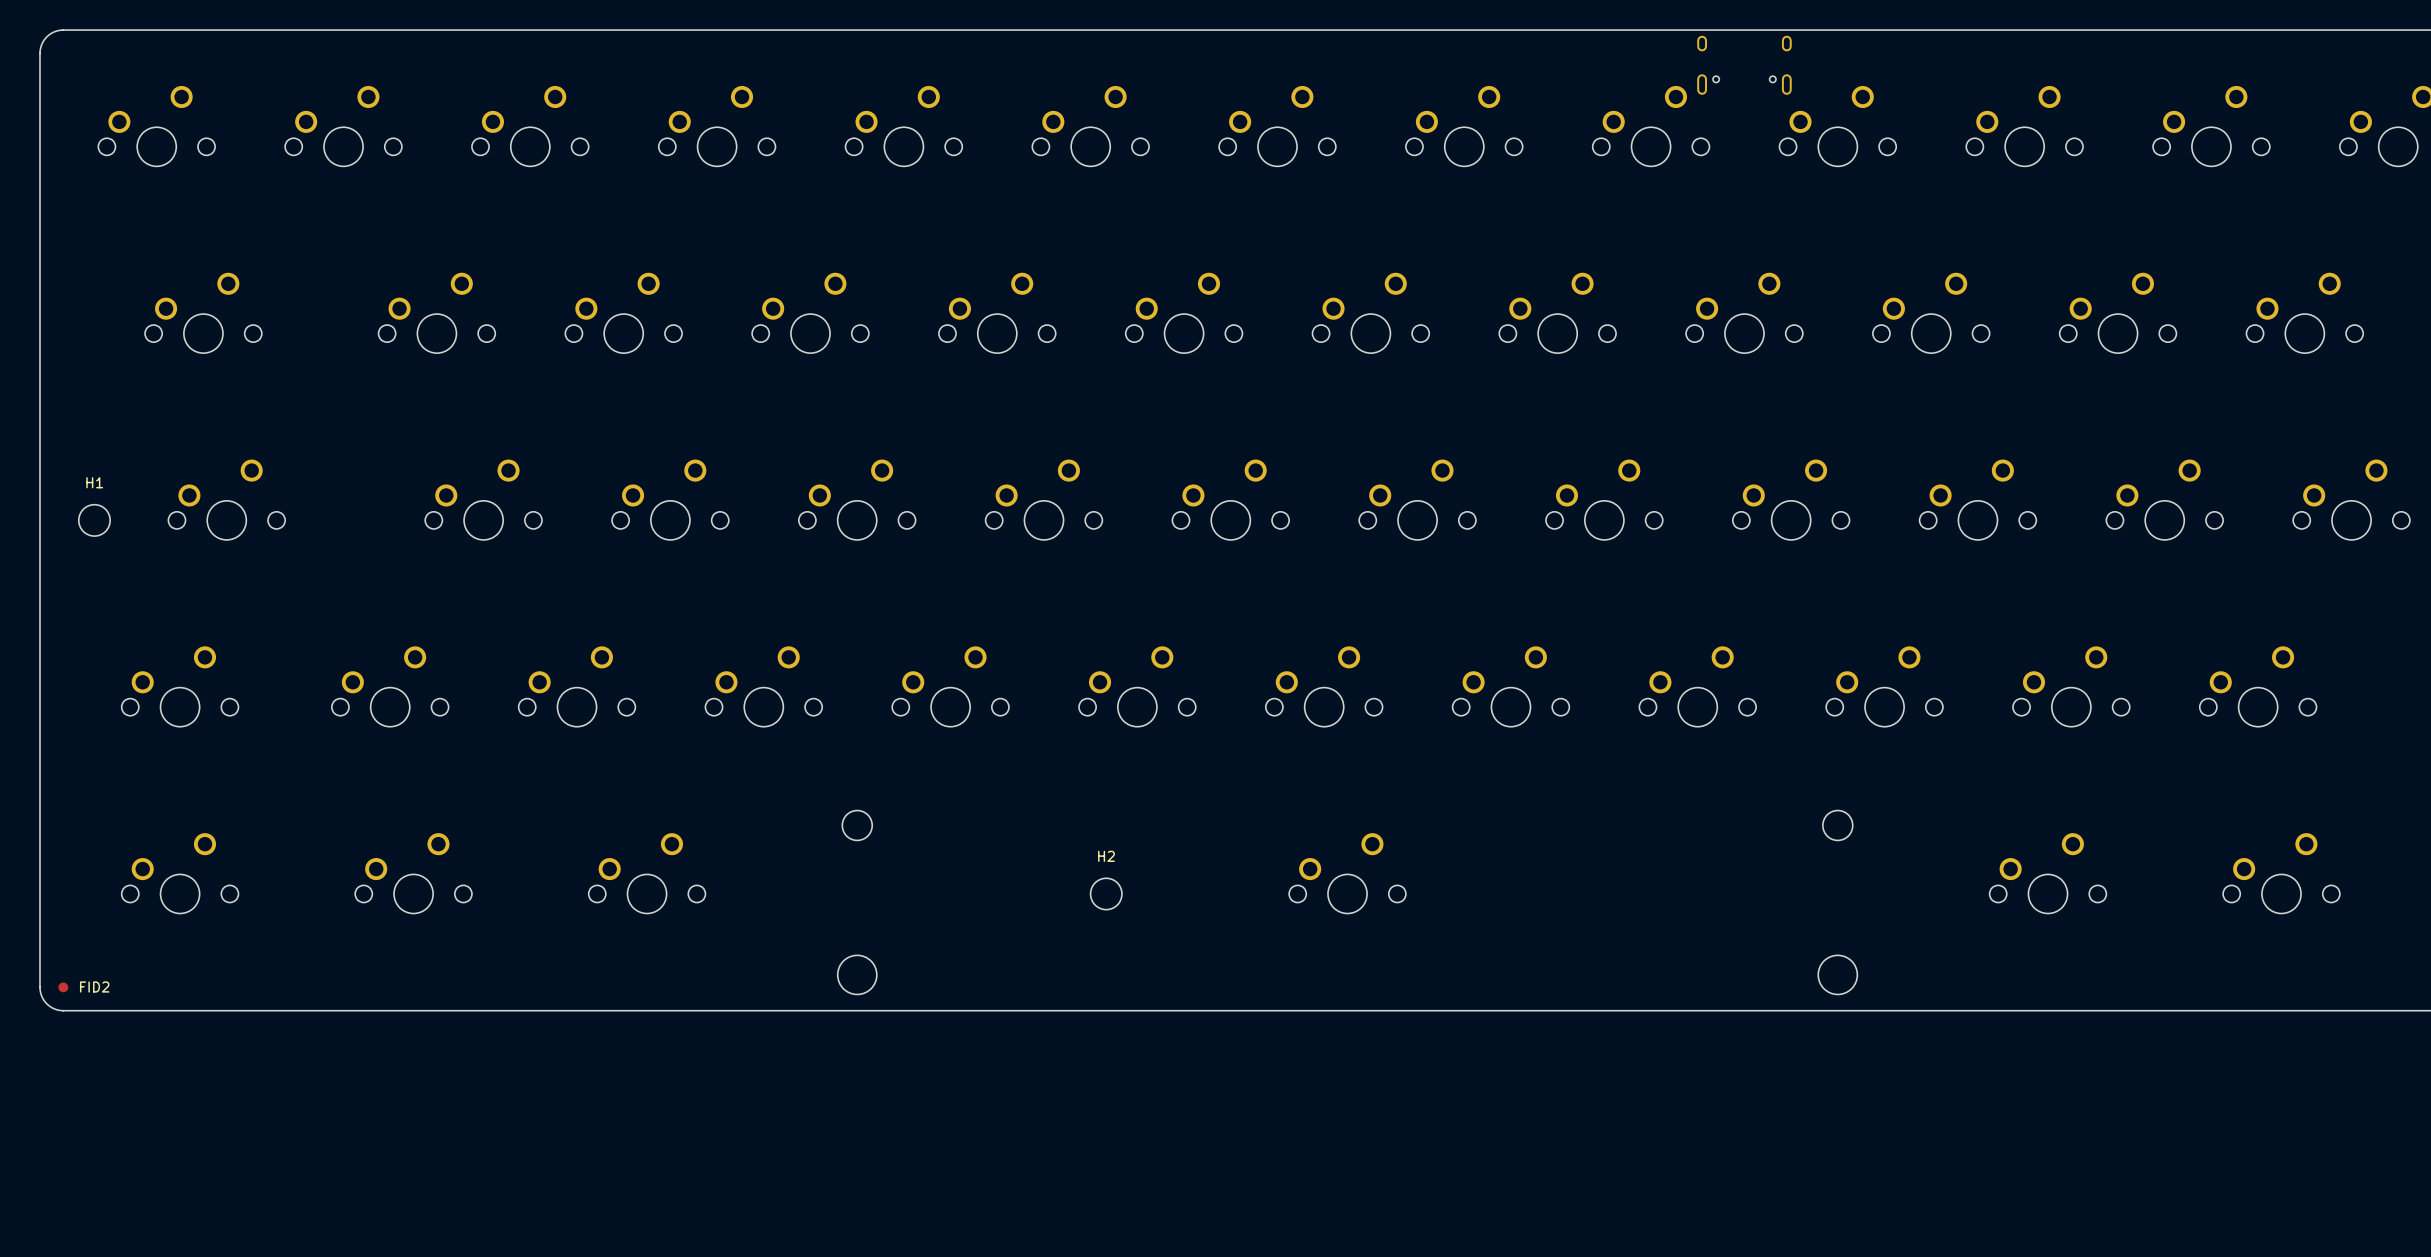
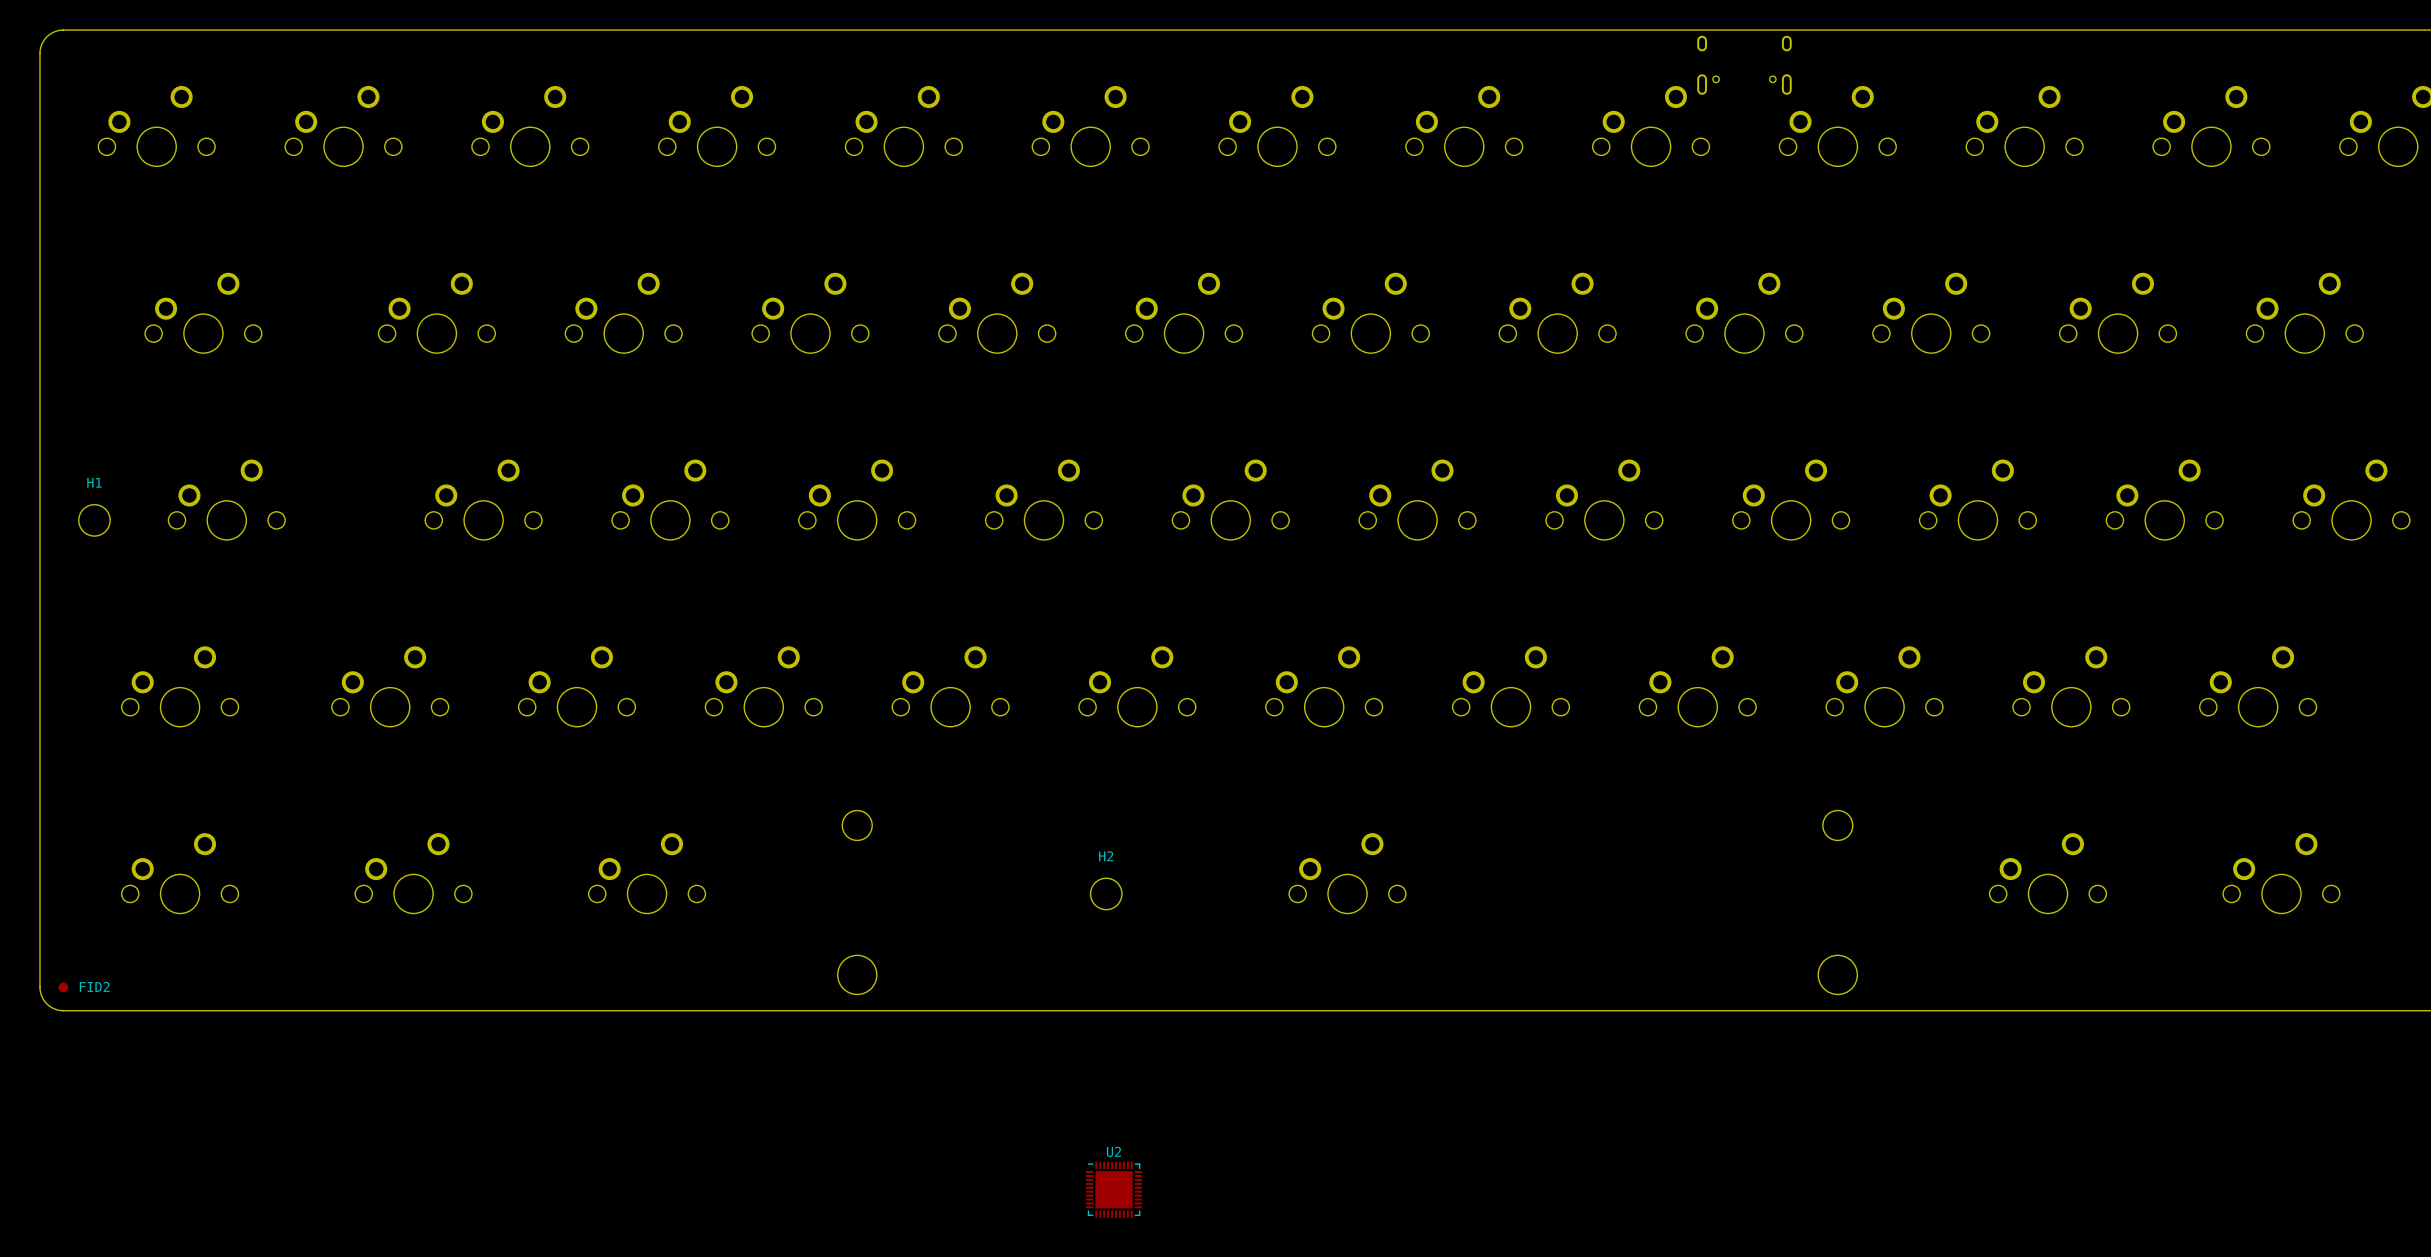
U2: none -> (1114, 1189)

